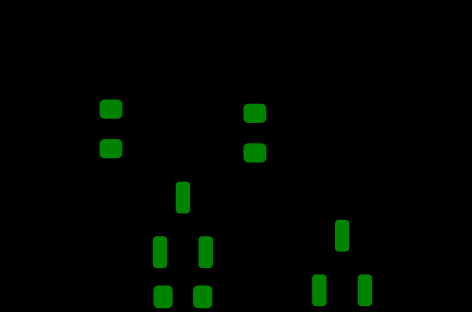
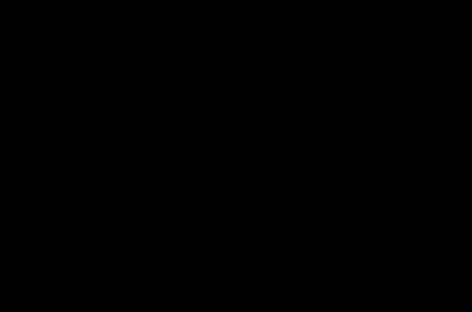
part: (110, 128) -> none
part: (254, 133) -> none
part: (182, 224) -> none
part: (342, 262) -> none
part: (182, 296) -> none

